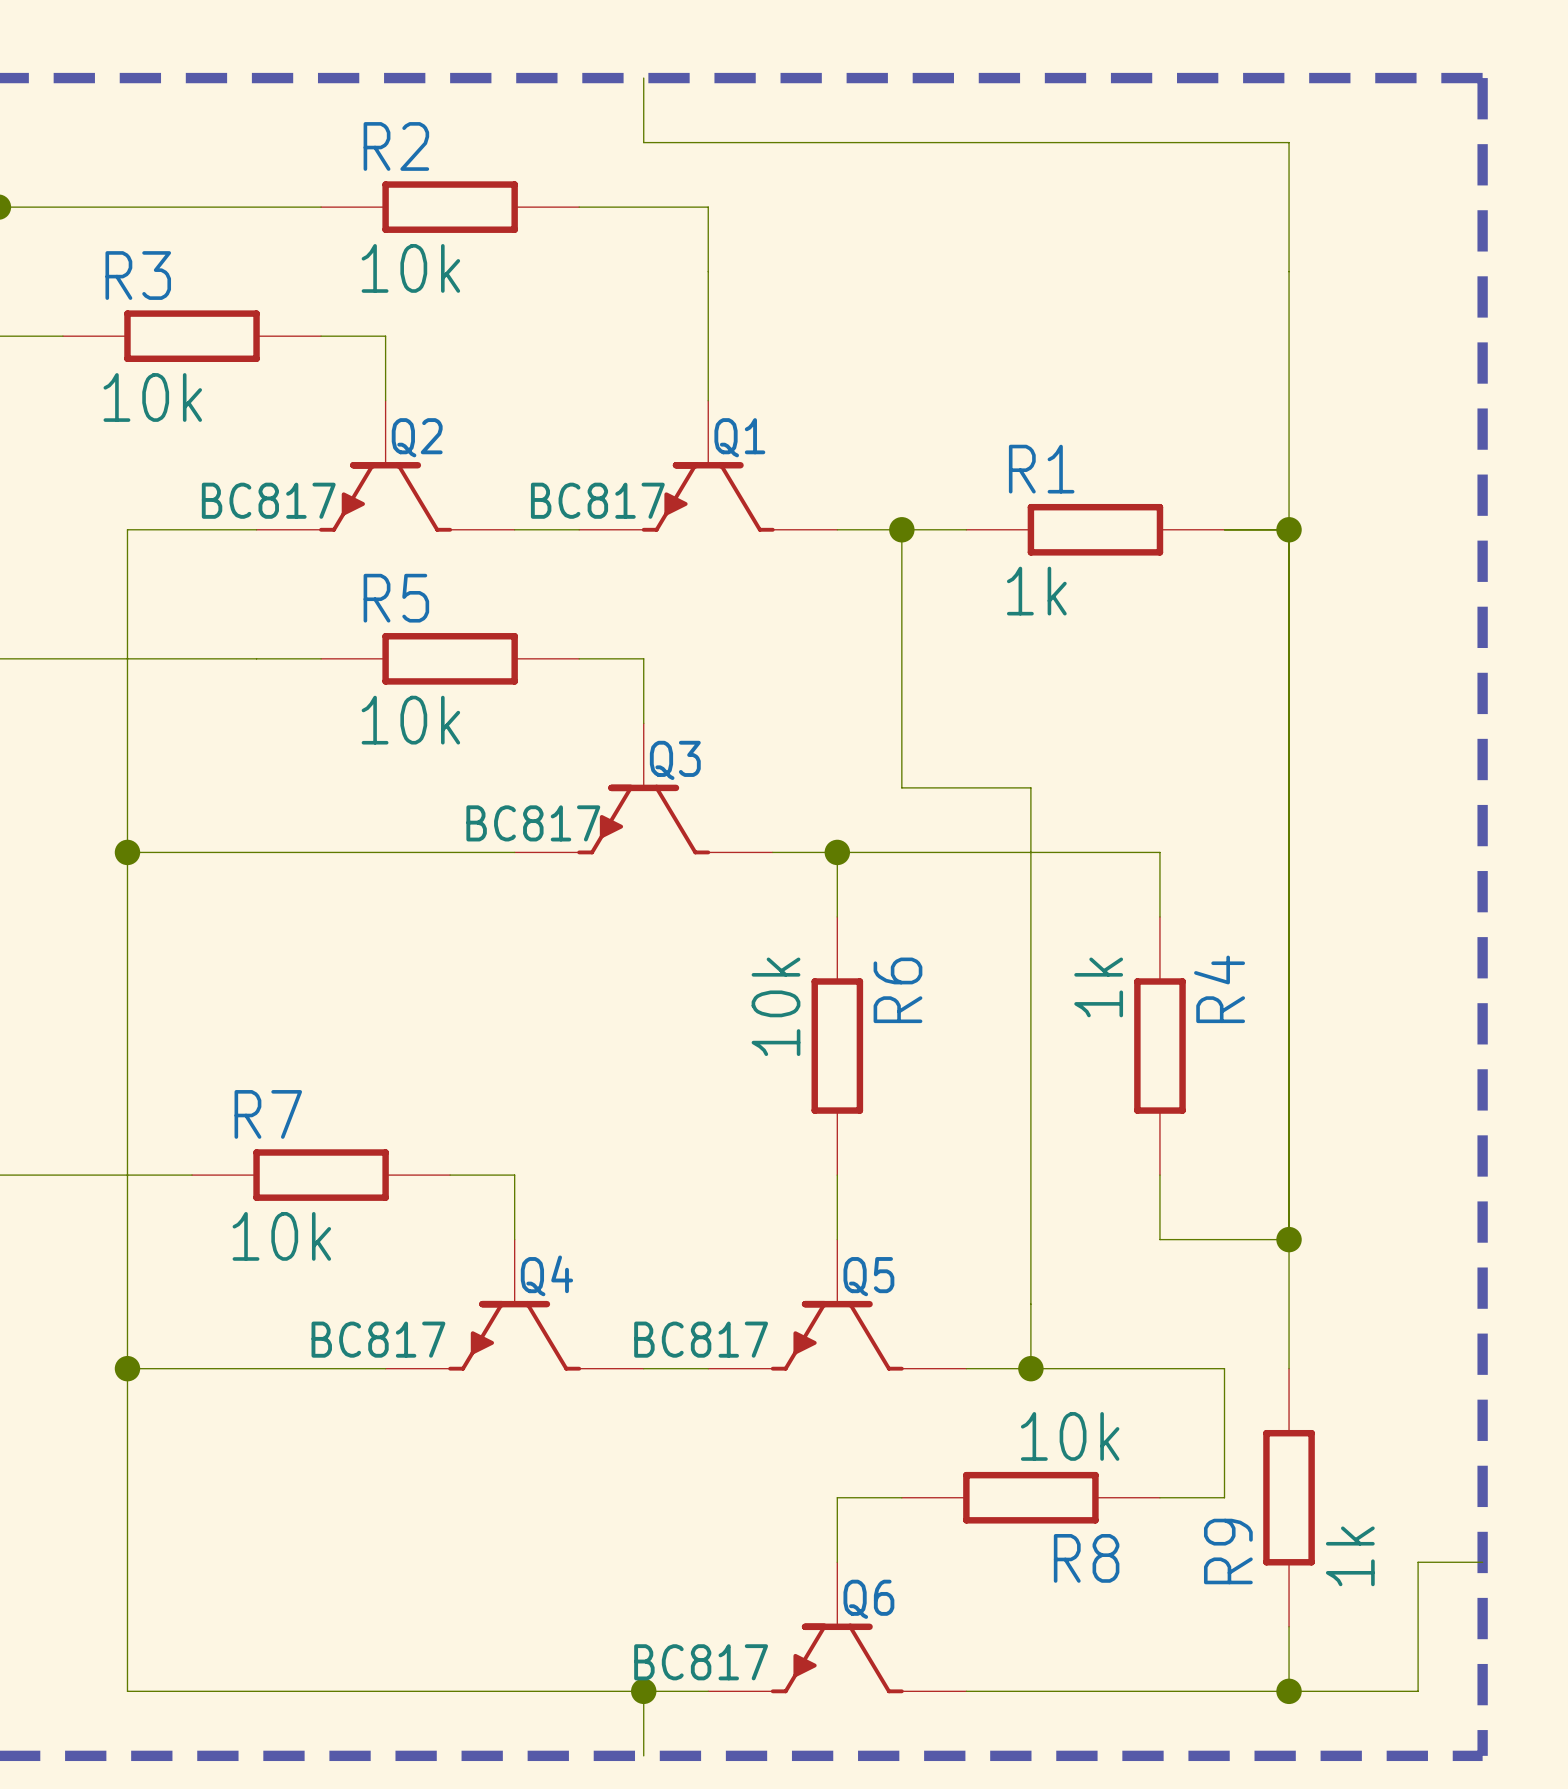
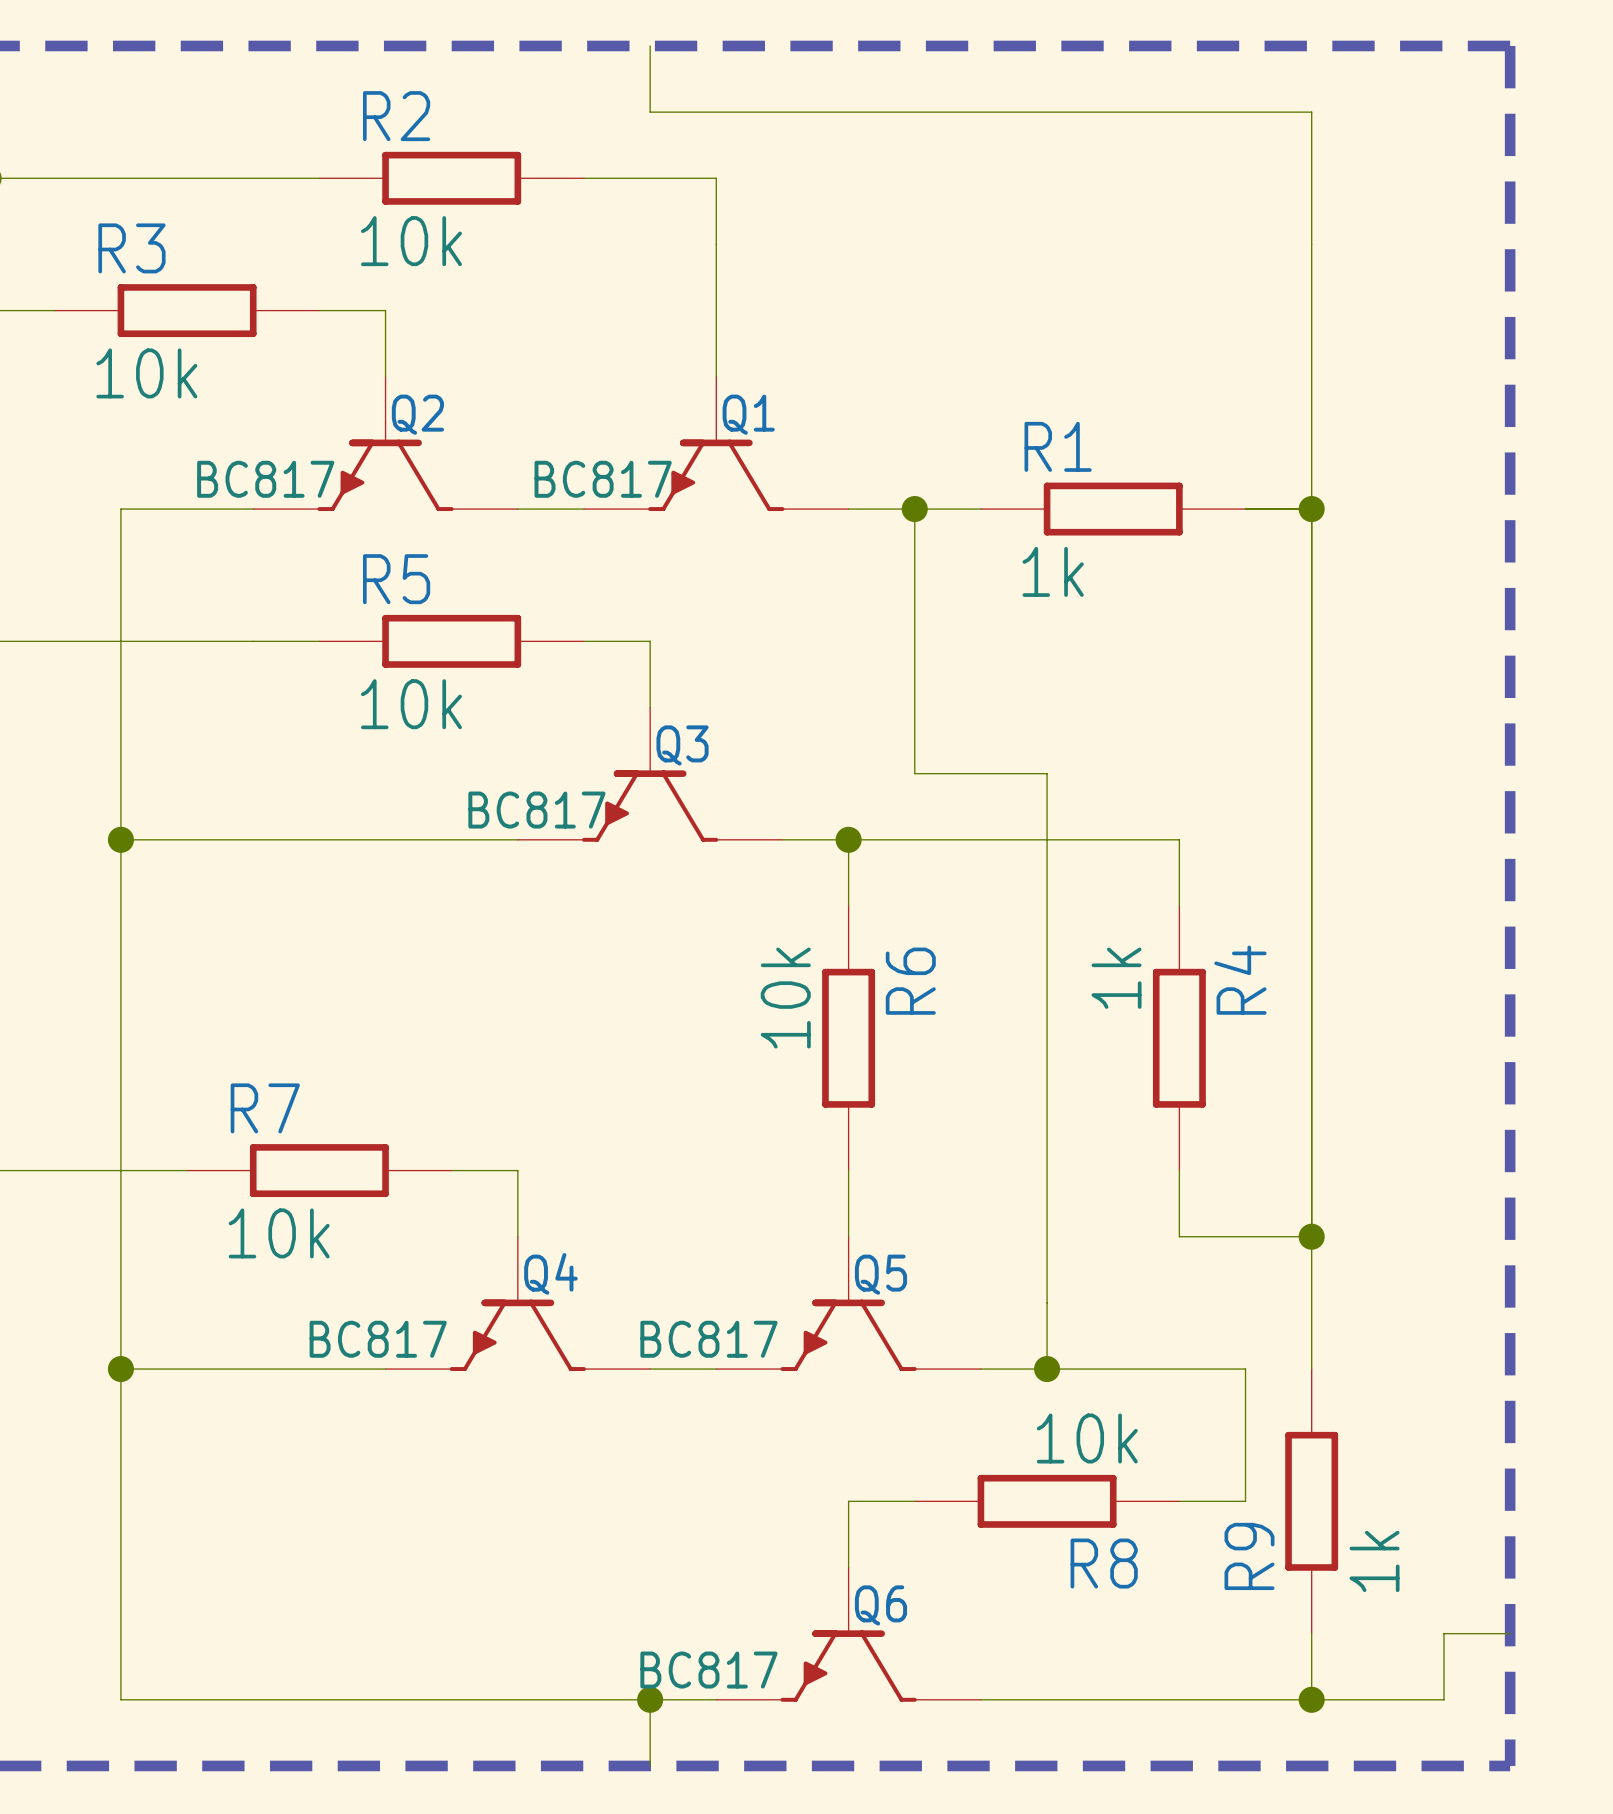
wire: (1482, 1562) (1418, 1562) (1418, 1626) -> (1510, 1633) (1443, 1633)

